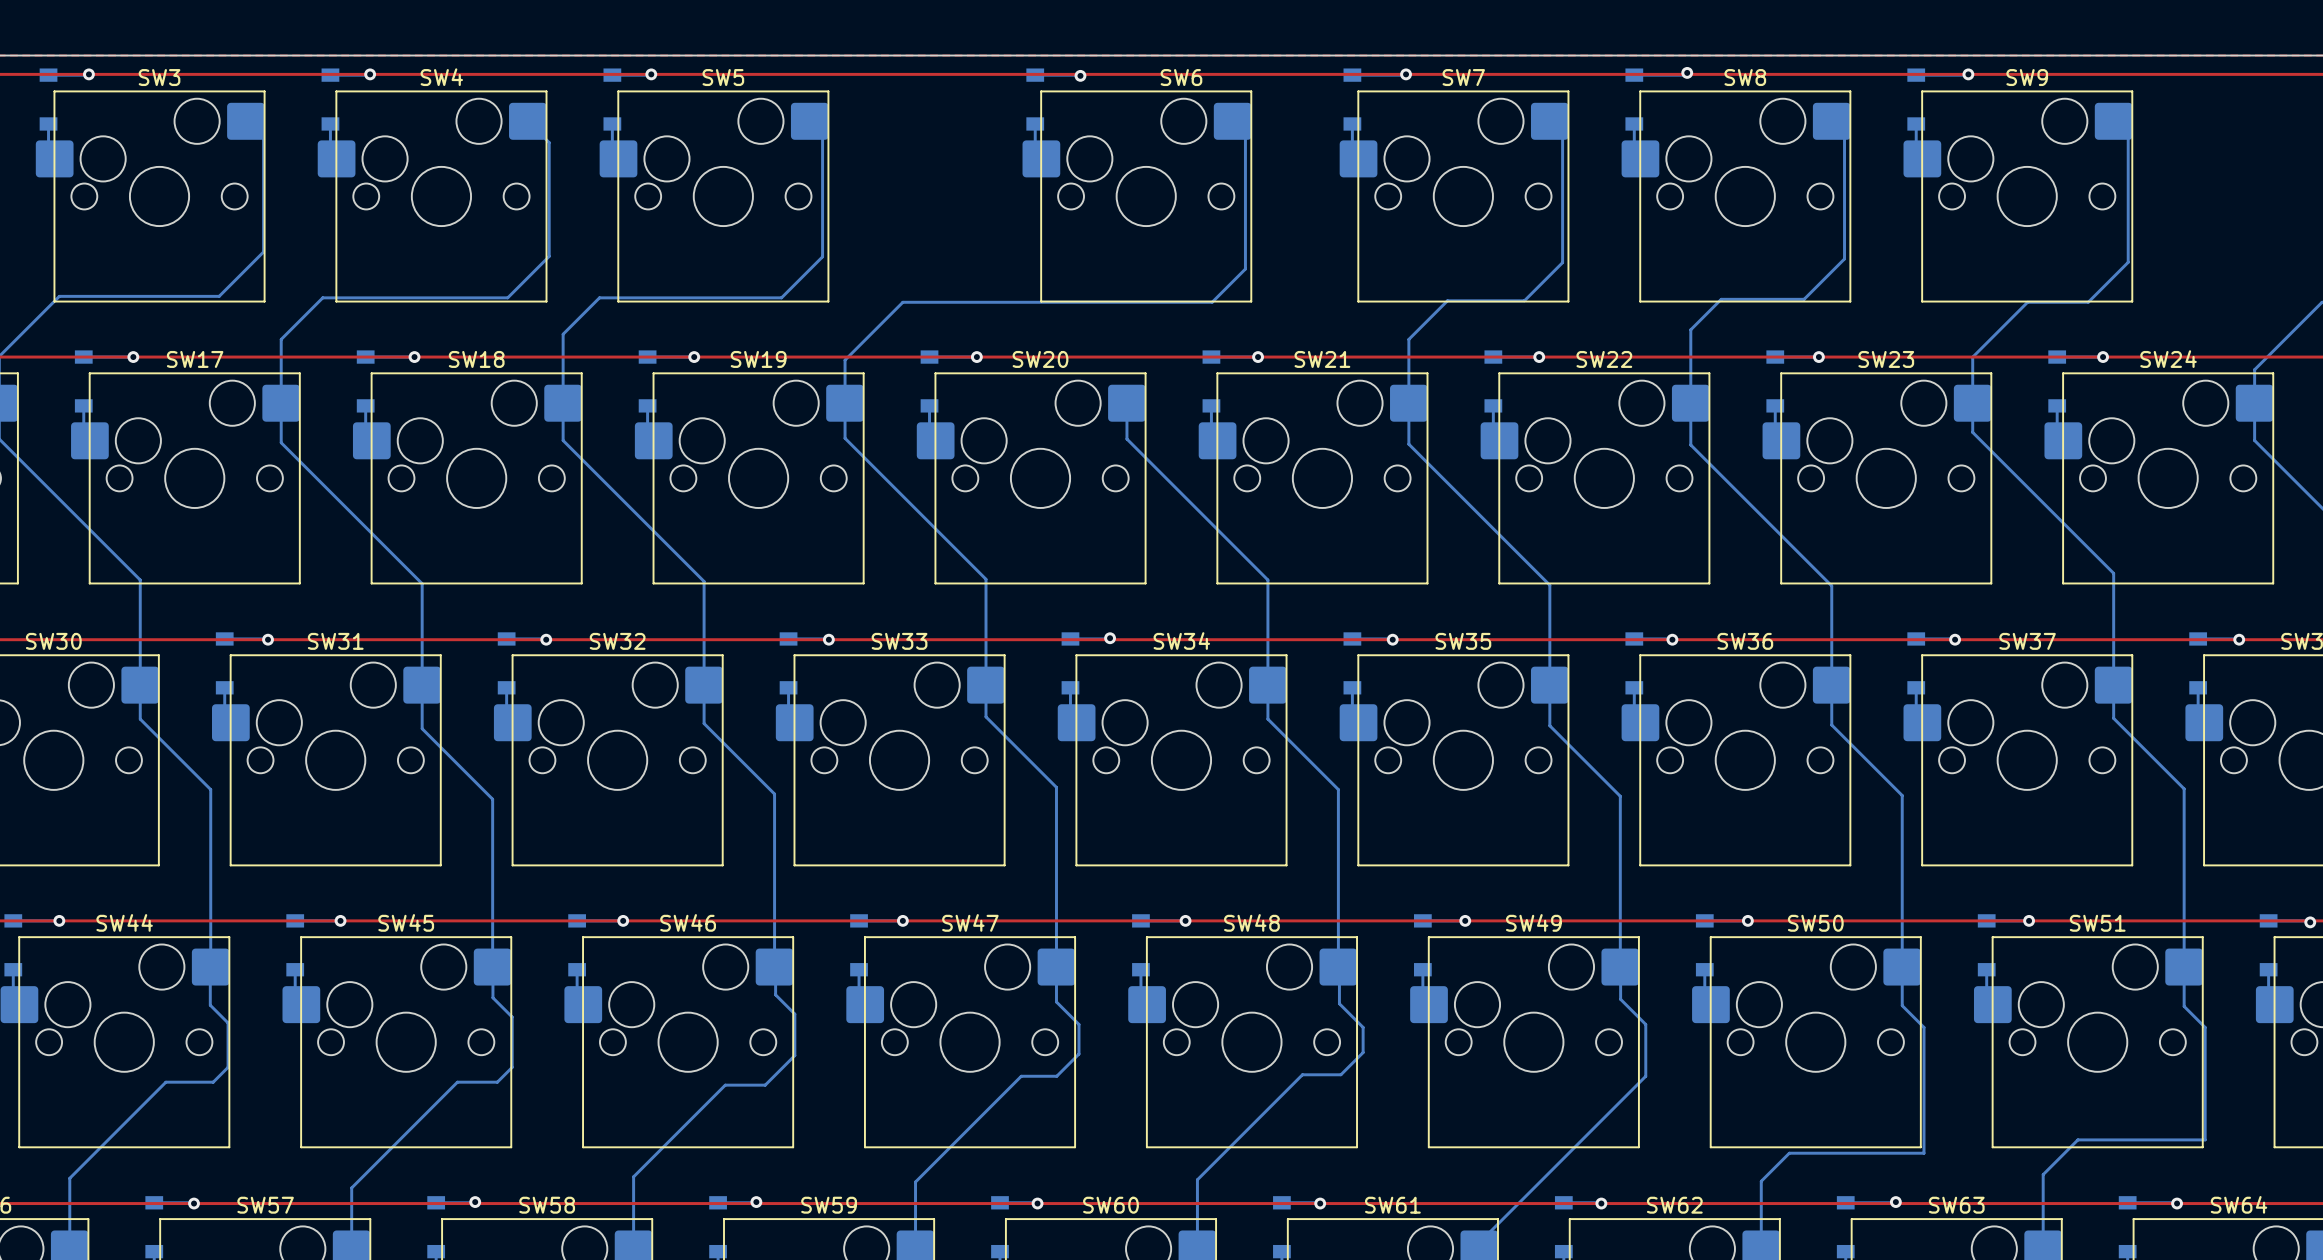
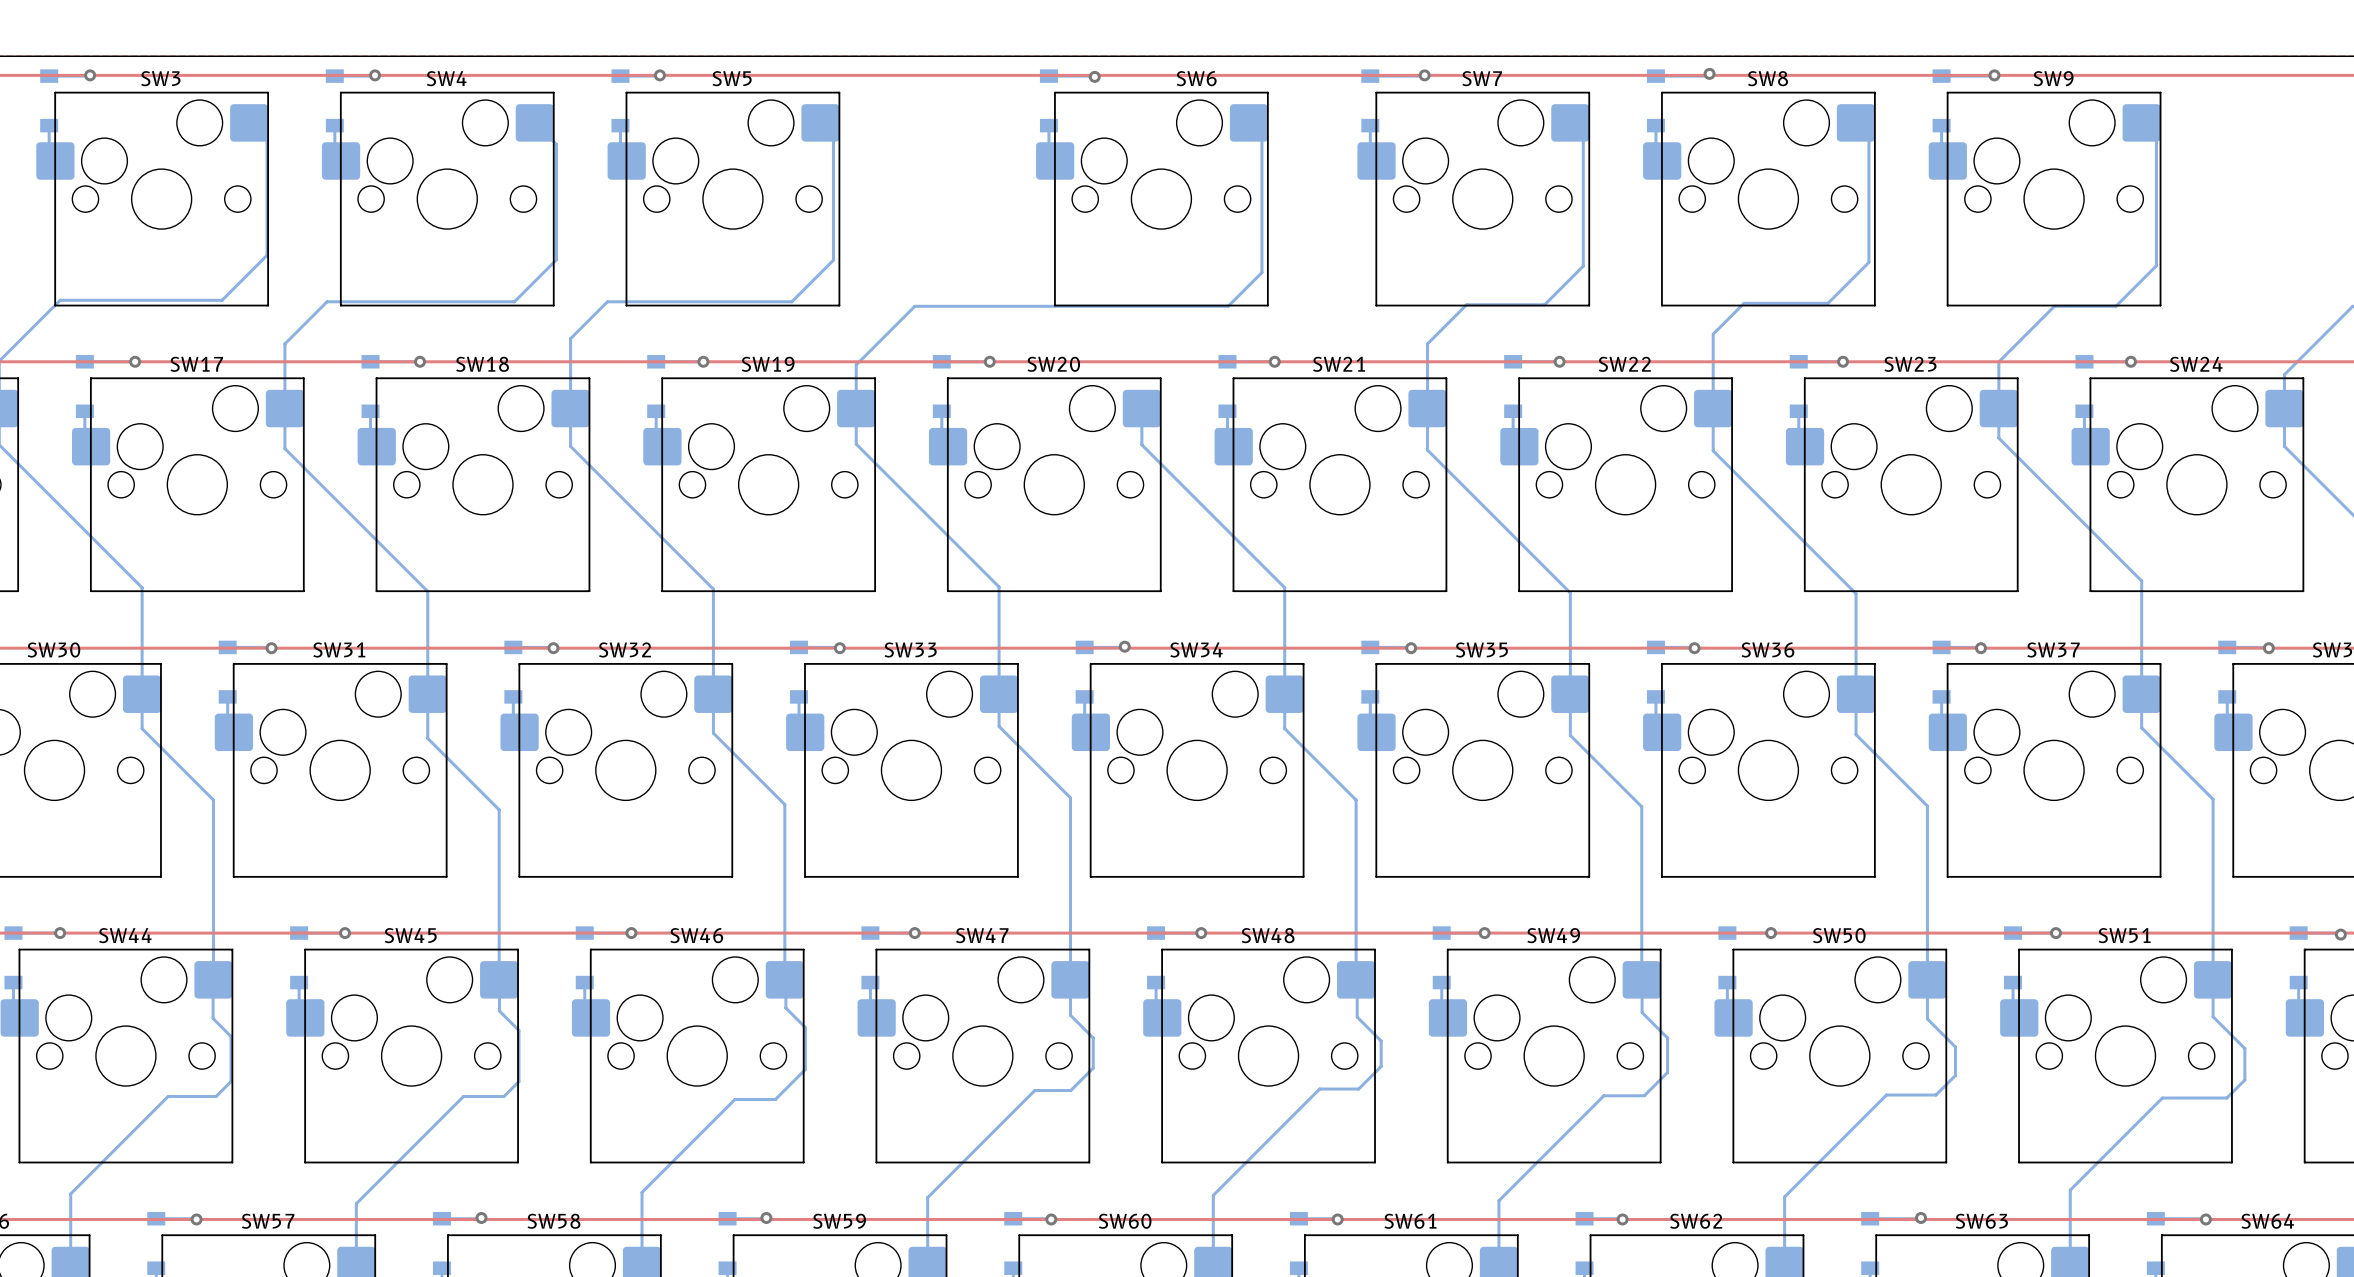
bottom track: (2184, 1003) (2184, 1006) (2205, 1027) (2205, 1139) (2077, 1139) -> (2213, 1016) (2244, 1048) (2244, 1080) (2226, 1098) (2162, 1098) (2105, 1155)
bottom track: (1923, 1027) (1923, 1153) (1789, 1153) -> (1949, 1041) (1955, 1047) (1955, 1075) (1935, 1095) (1886, 1095) (1813, 1168)
bottom track: (1645, 1058) (1645, 1076) (1479, 1242) -> (1667, 1072) (1644, 1095) (1603, 1095) (1498, 1200) (1498, 1259)

